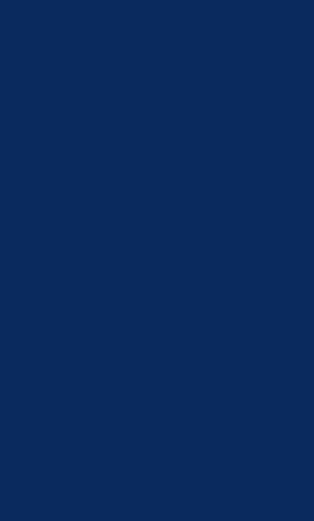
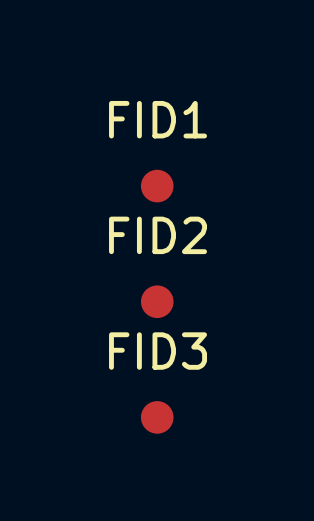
FID1: none -> (157, 186)
FID2: none -> (157, 301)
FID3: none -> (157, 417)

